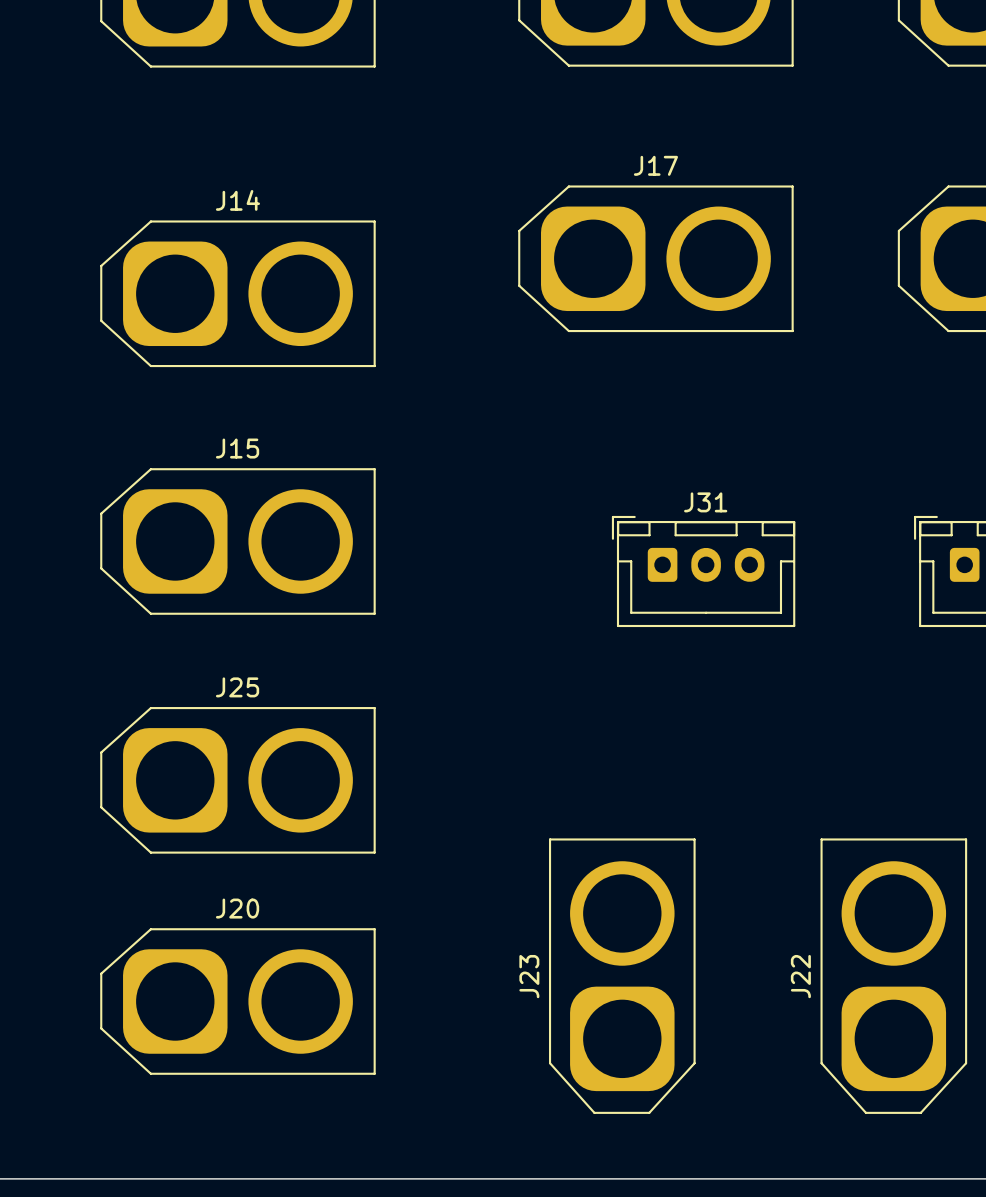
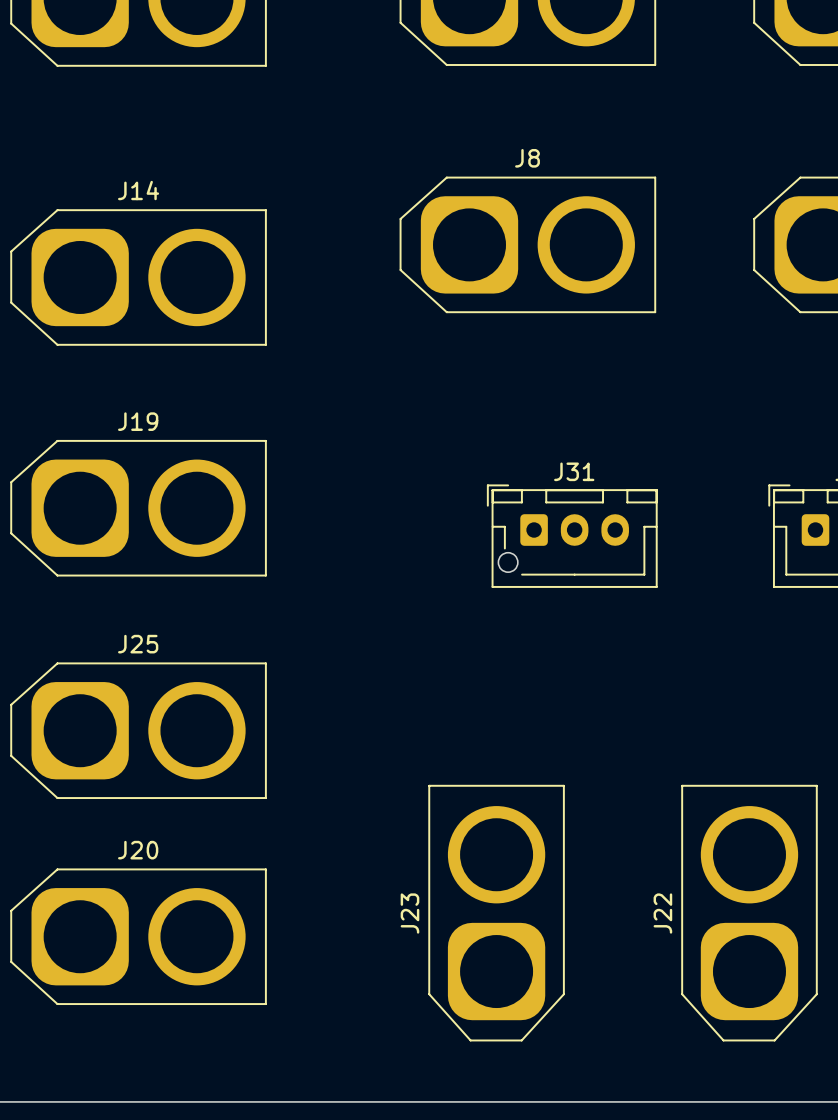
J17 name: J17 (655, 165) -> J8 (527, 158)
J15 name: J15 (237, 448) -> J19 (138, 421)
J31 footprint: [611, 515, 796, 628] -> [486, 484, 658, 588]

